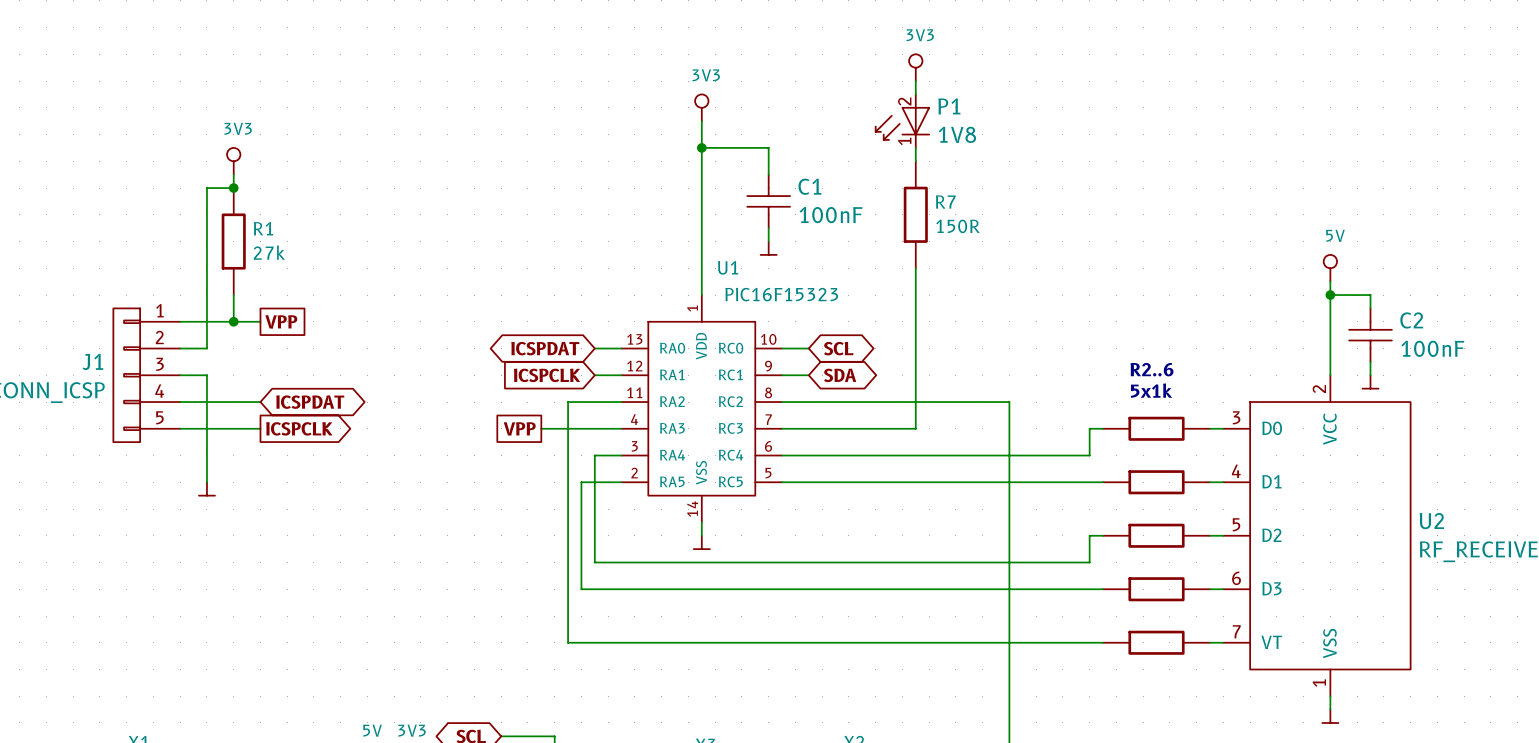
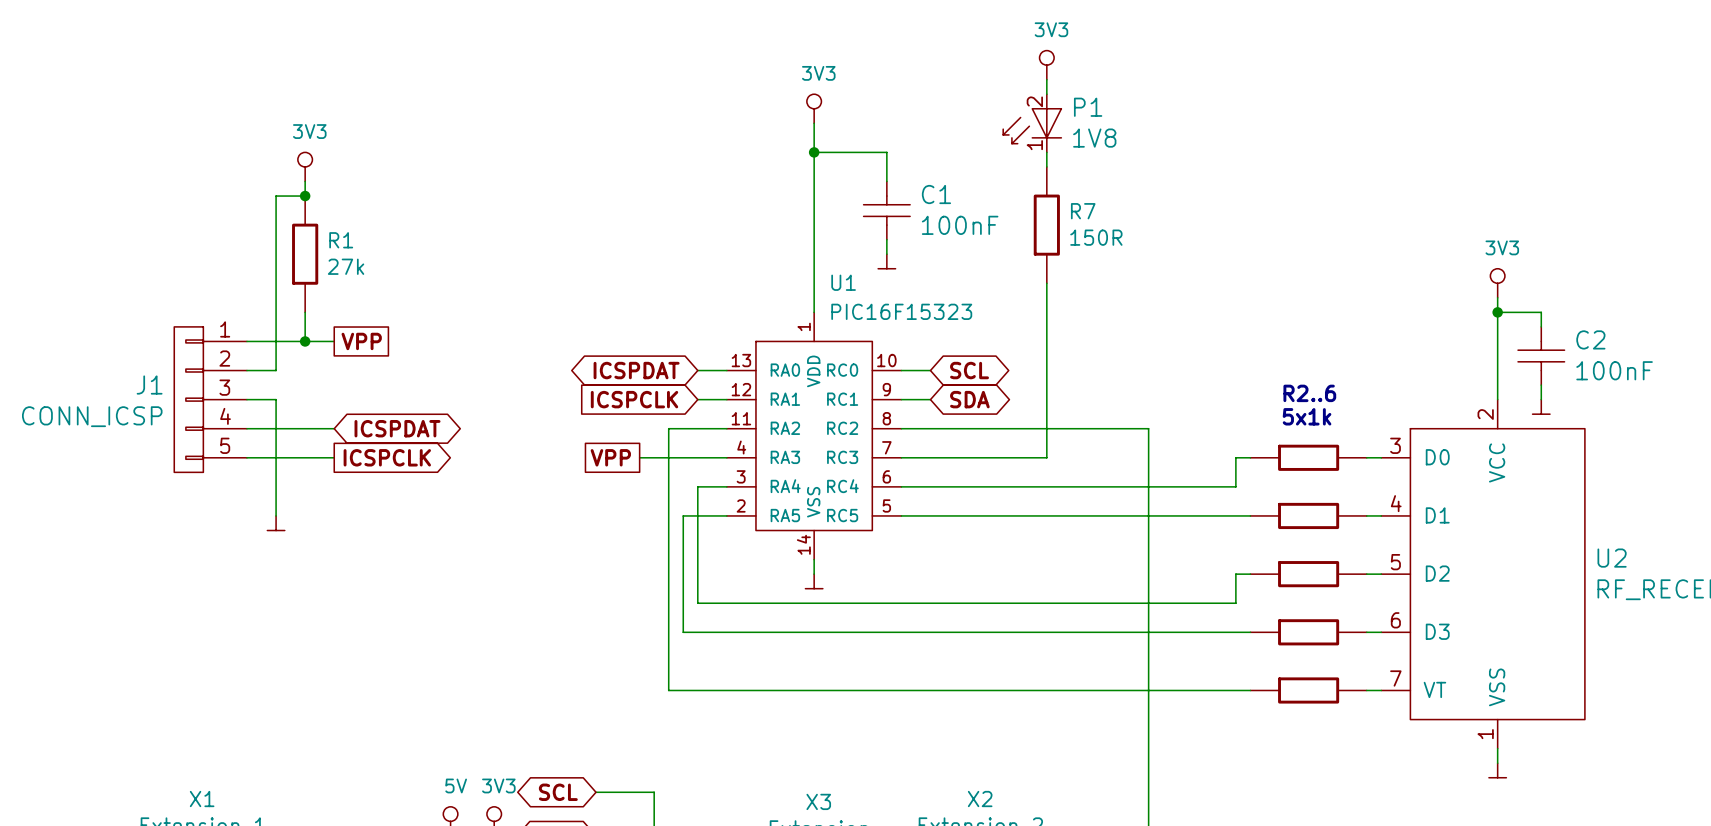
power symbol: 5V (1330, 268) -> 3V3 (1497, 283)

